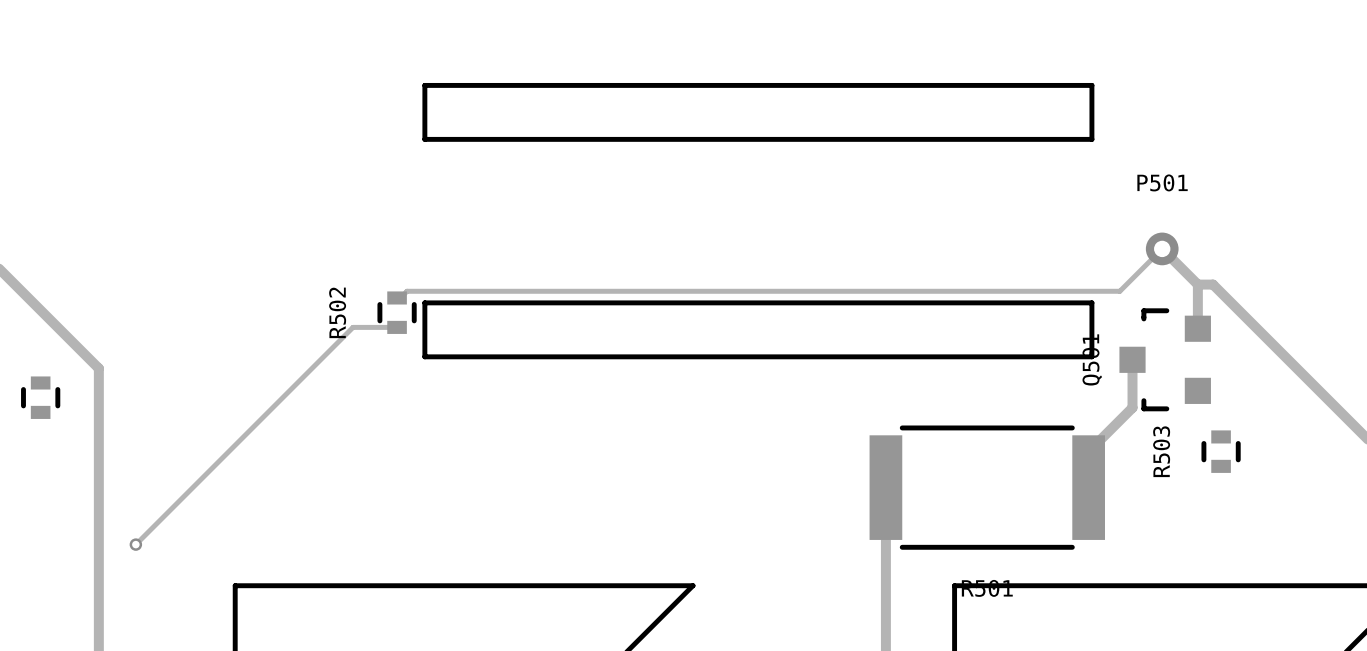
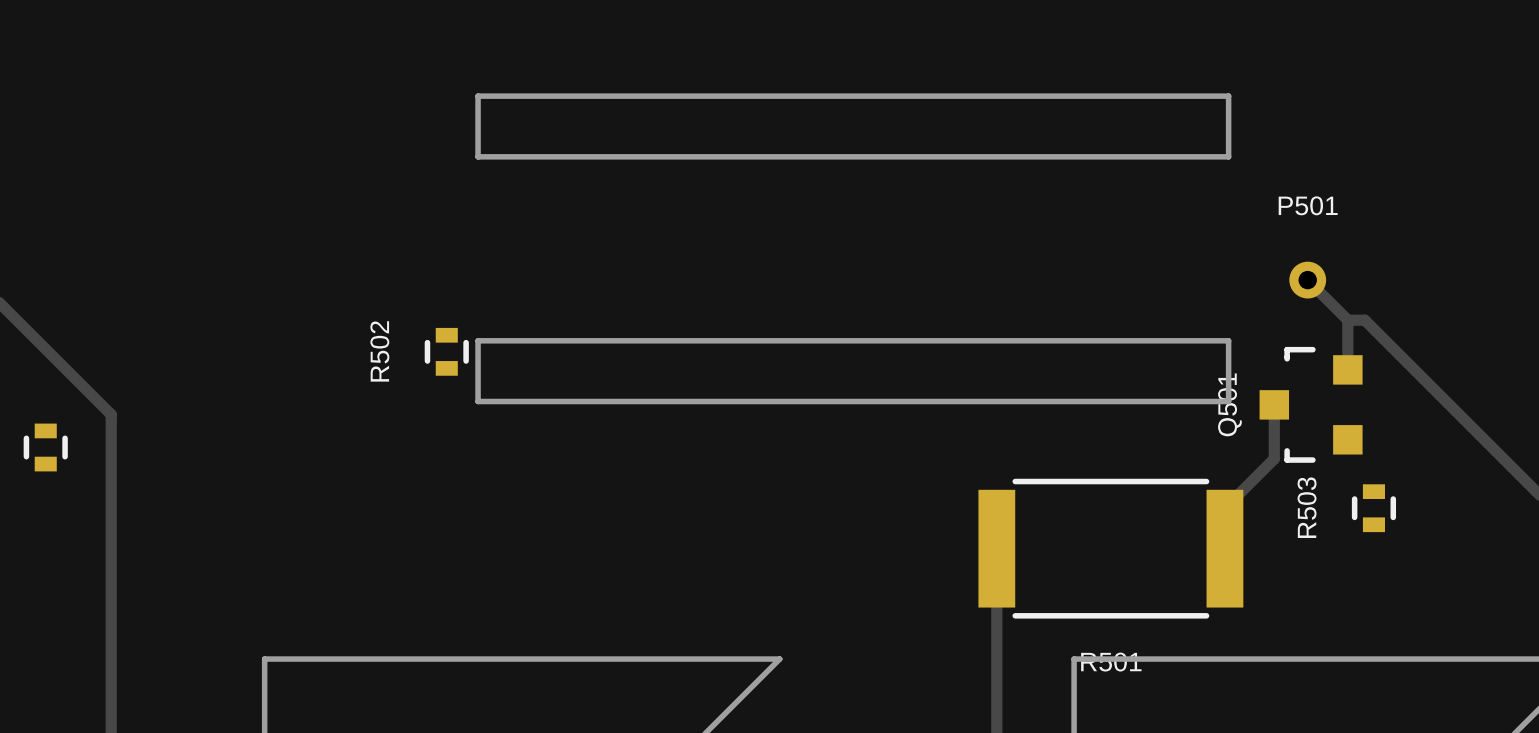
track: (1162, 248) (1119, 291) (407, 291) (400, 297) (397, 297) -> none
track: (397, 327) (353, 327) (135, 544) -> none
via: (135, 544) -> none

